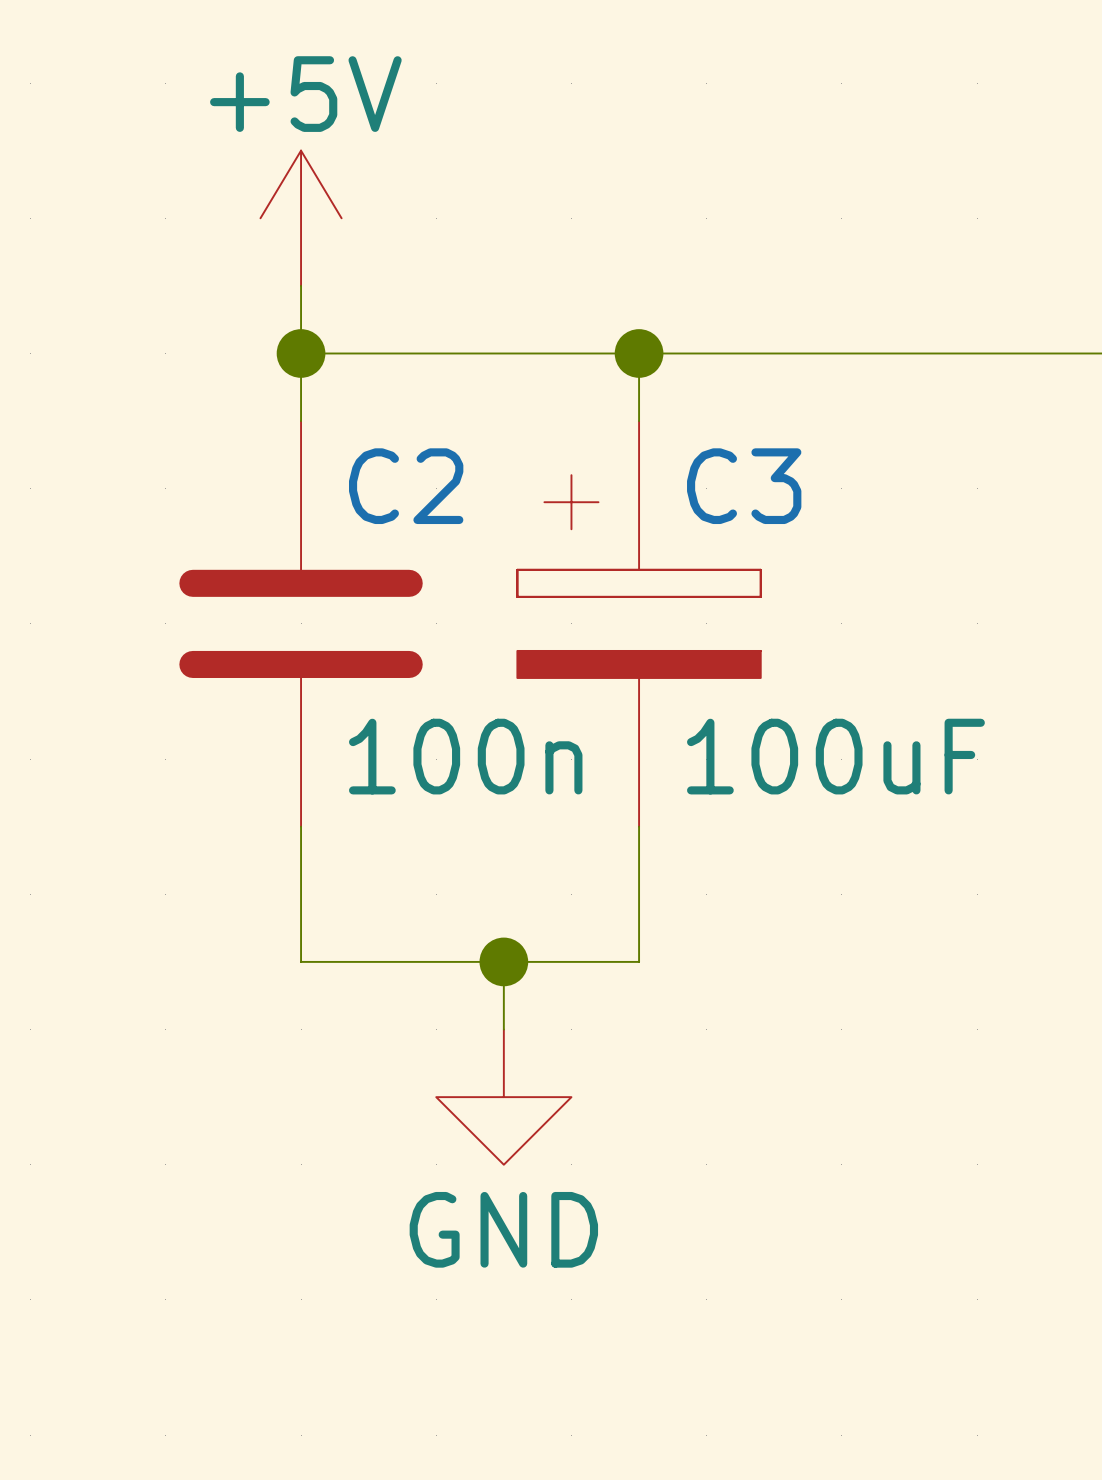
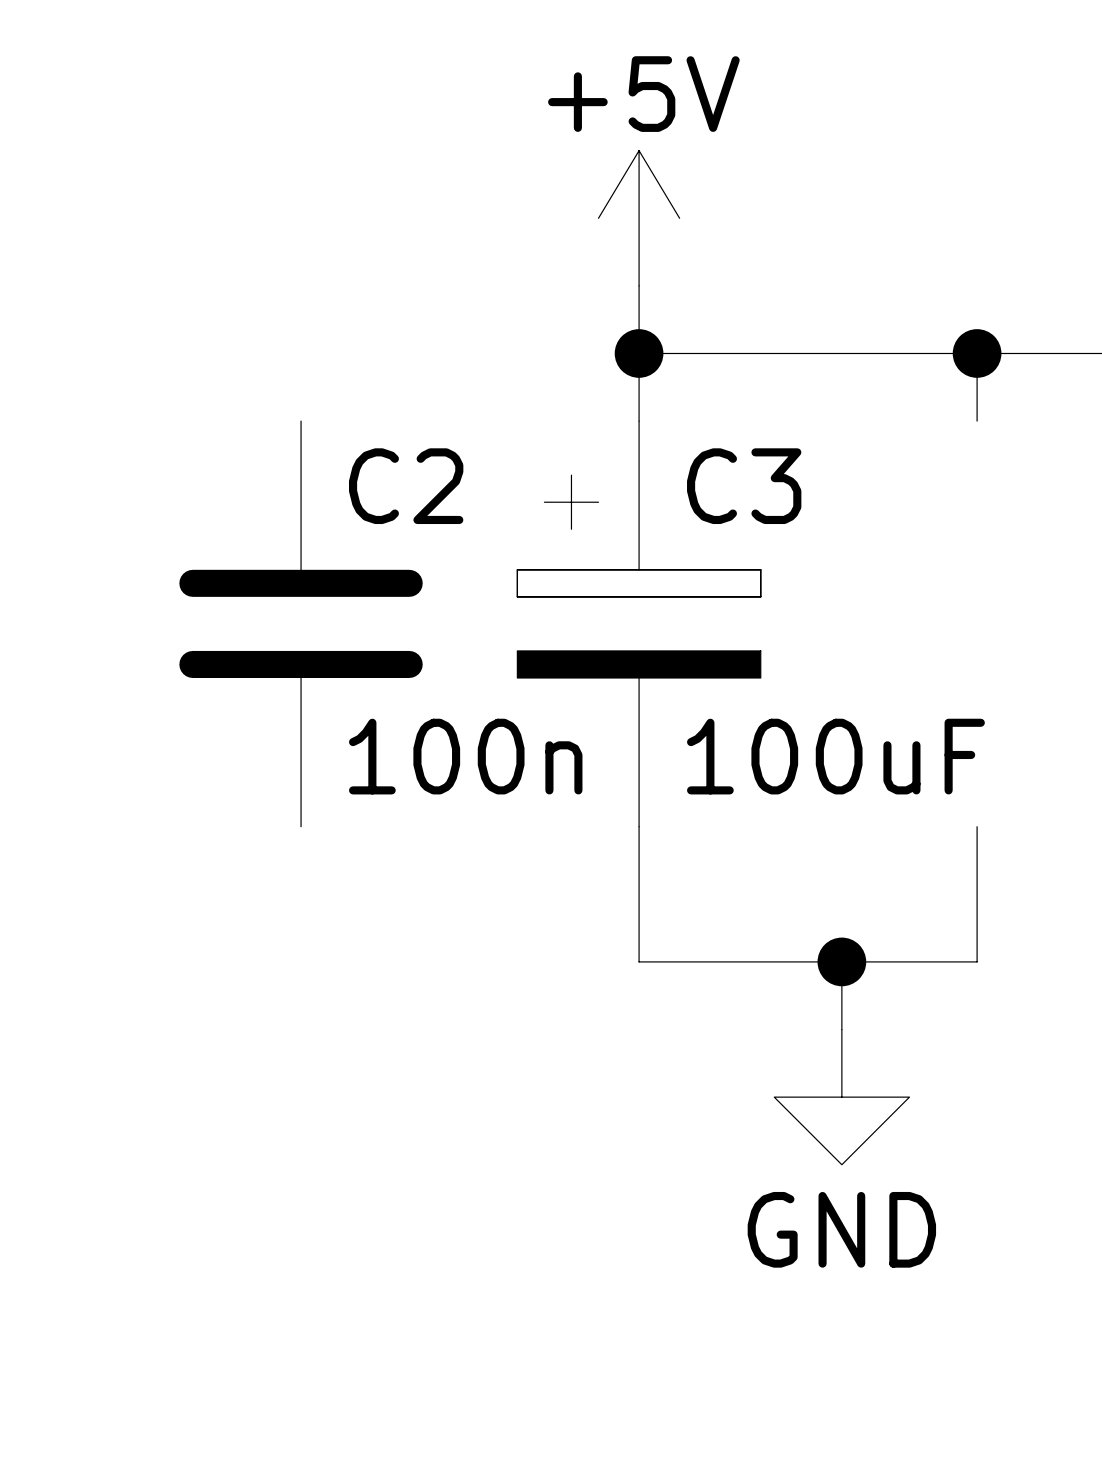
power symbol position: +5V (301, 218) -> +5V (639, 218)
wire: (301, 285) (301, 421) -> none
wire: (301, 353) (639, 353) -> (639, 285) (639, 353)
junction: (301, 353) -> none
wire: none -> (977, 353) (977, 421)
junction: none -> (977, 353)
wire: (301, 826) (301, 961) (639, 961) -> (977, 826) (977, 961) (639, 961)
wire: (503, 961) (503, 1029) -> (841, 961) (841, 1029)
junction: (503, 961) -> none
junction: none -> (841, 961)
power symbol position: GND (503, 1097) -> GND (841, 1097)

